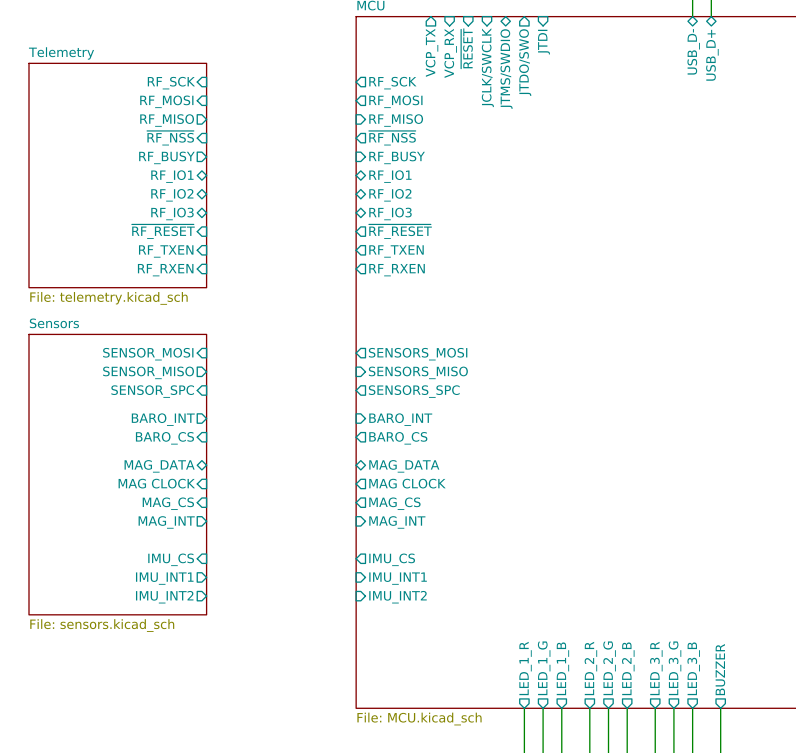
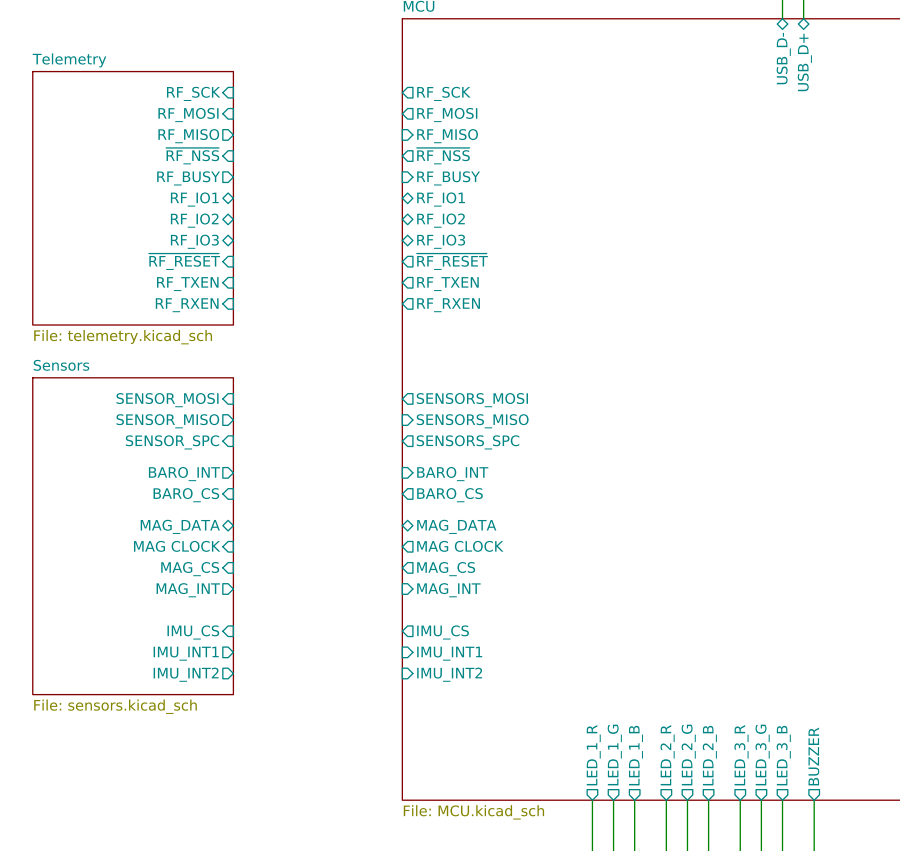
sheet pin: JTDI (544, 42) -> none
sheet pin: ~{RESET} (466, 48) -> none
sheet pin: VCP_TX (431, 52) -> none
sheet pin: VCP_RX (450, 53) -> none
sheet pin: JTDO/SWO (525, 62) -> none
sheet pin: JCLK/SWCLK (487, 67) -> none
sheet pin: JTMS/SWDIO (506, 69) -> none

